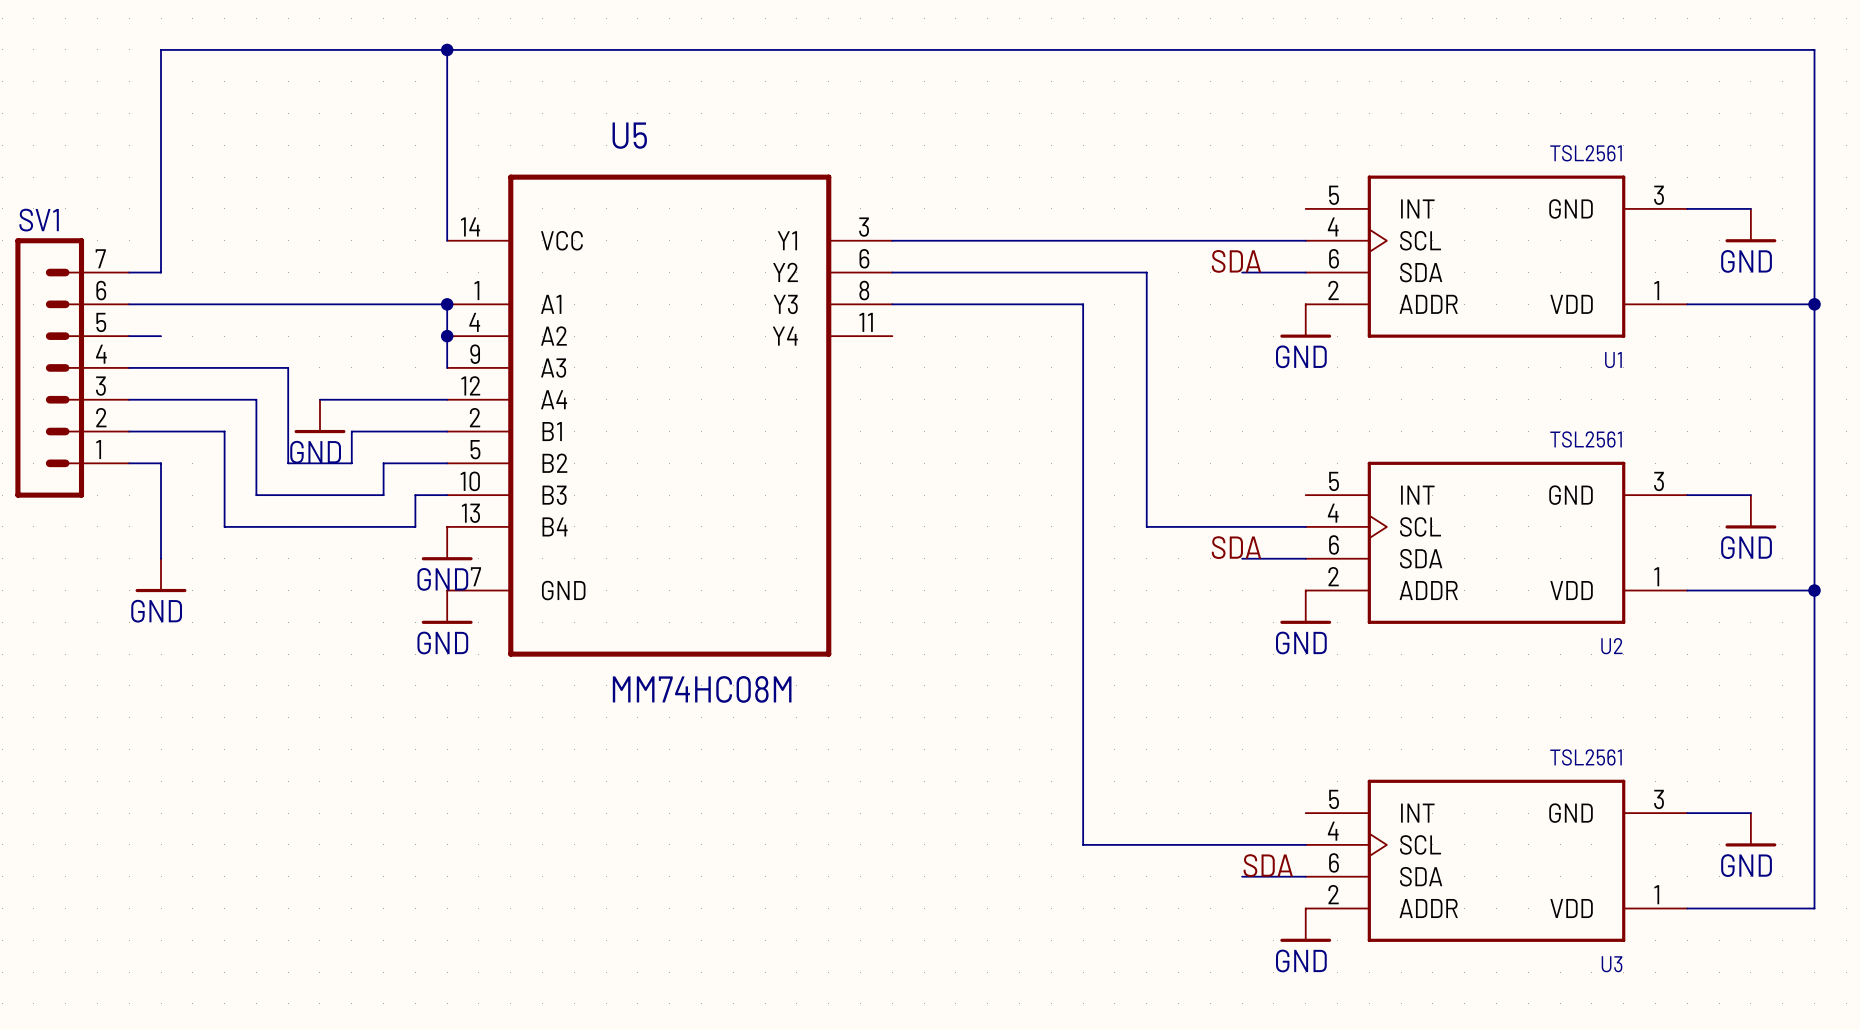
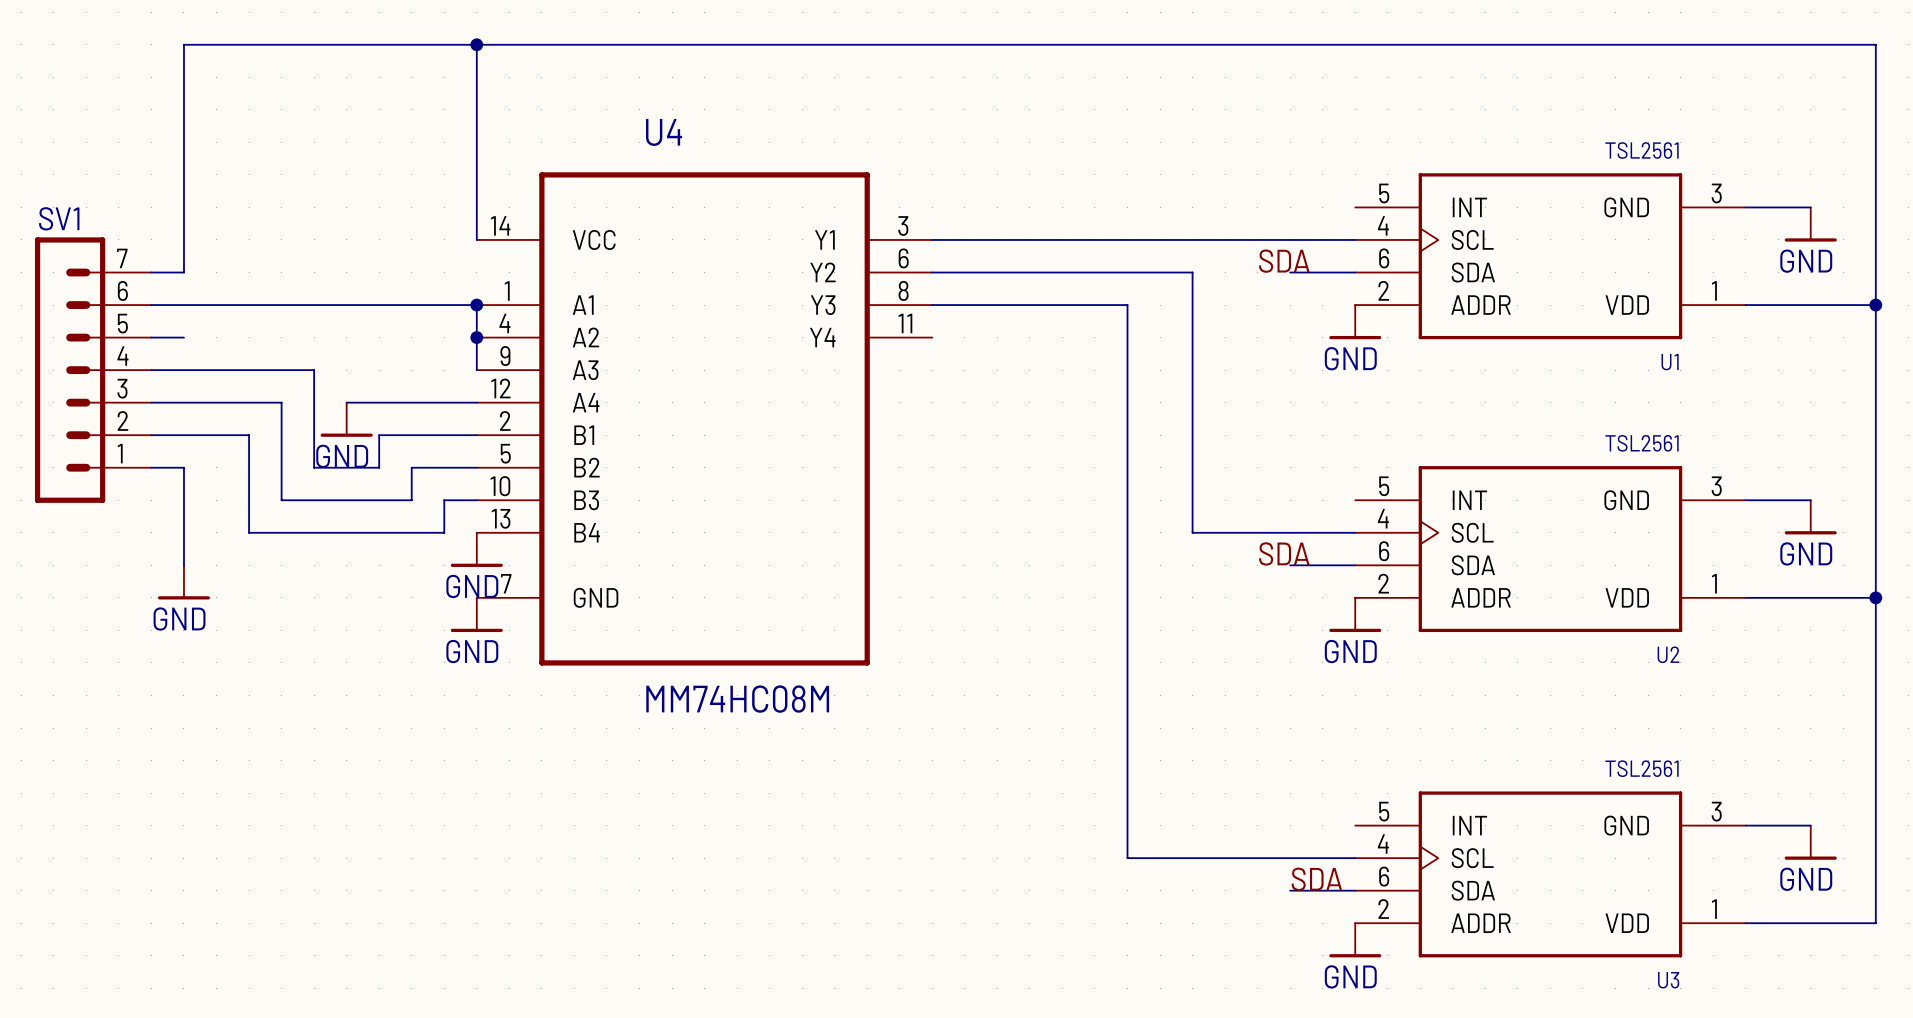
U5 name: U5 (629, 135) -> U4 (664, 132)

